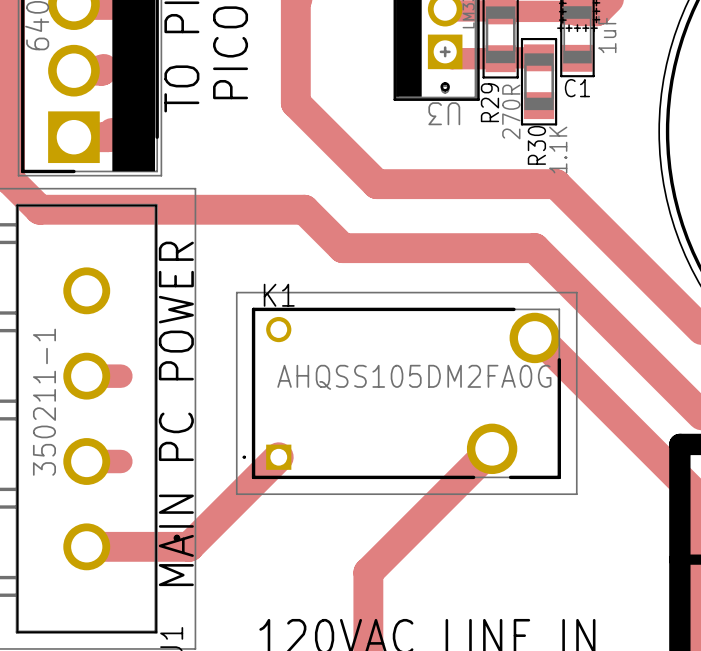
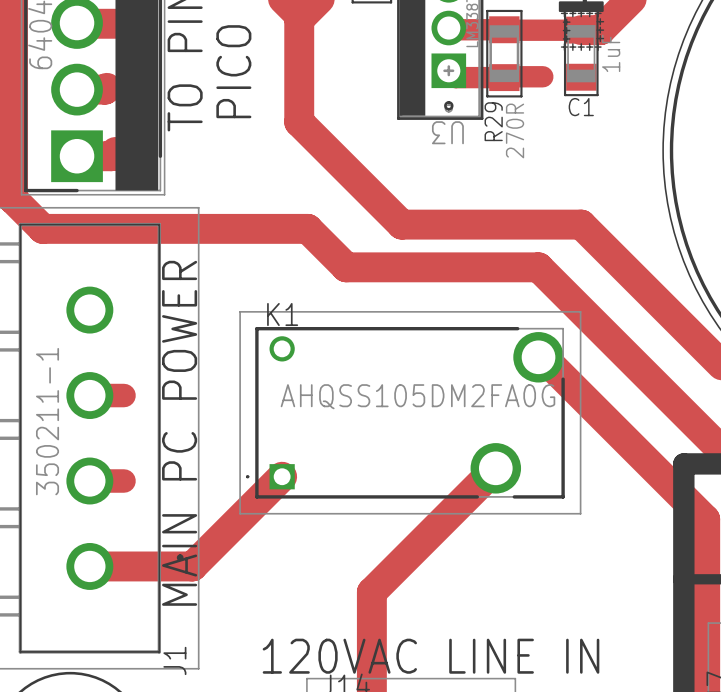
R30: 1.1K (539, 81) -> none
track: (376, 184) (556, 184) (577, 205) -> (380, 203) (401, 224) (581, 224)

